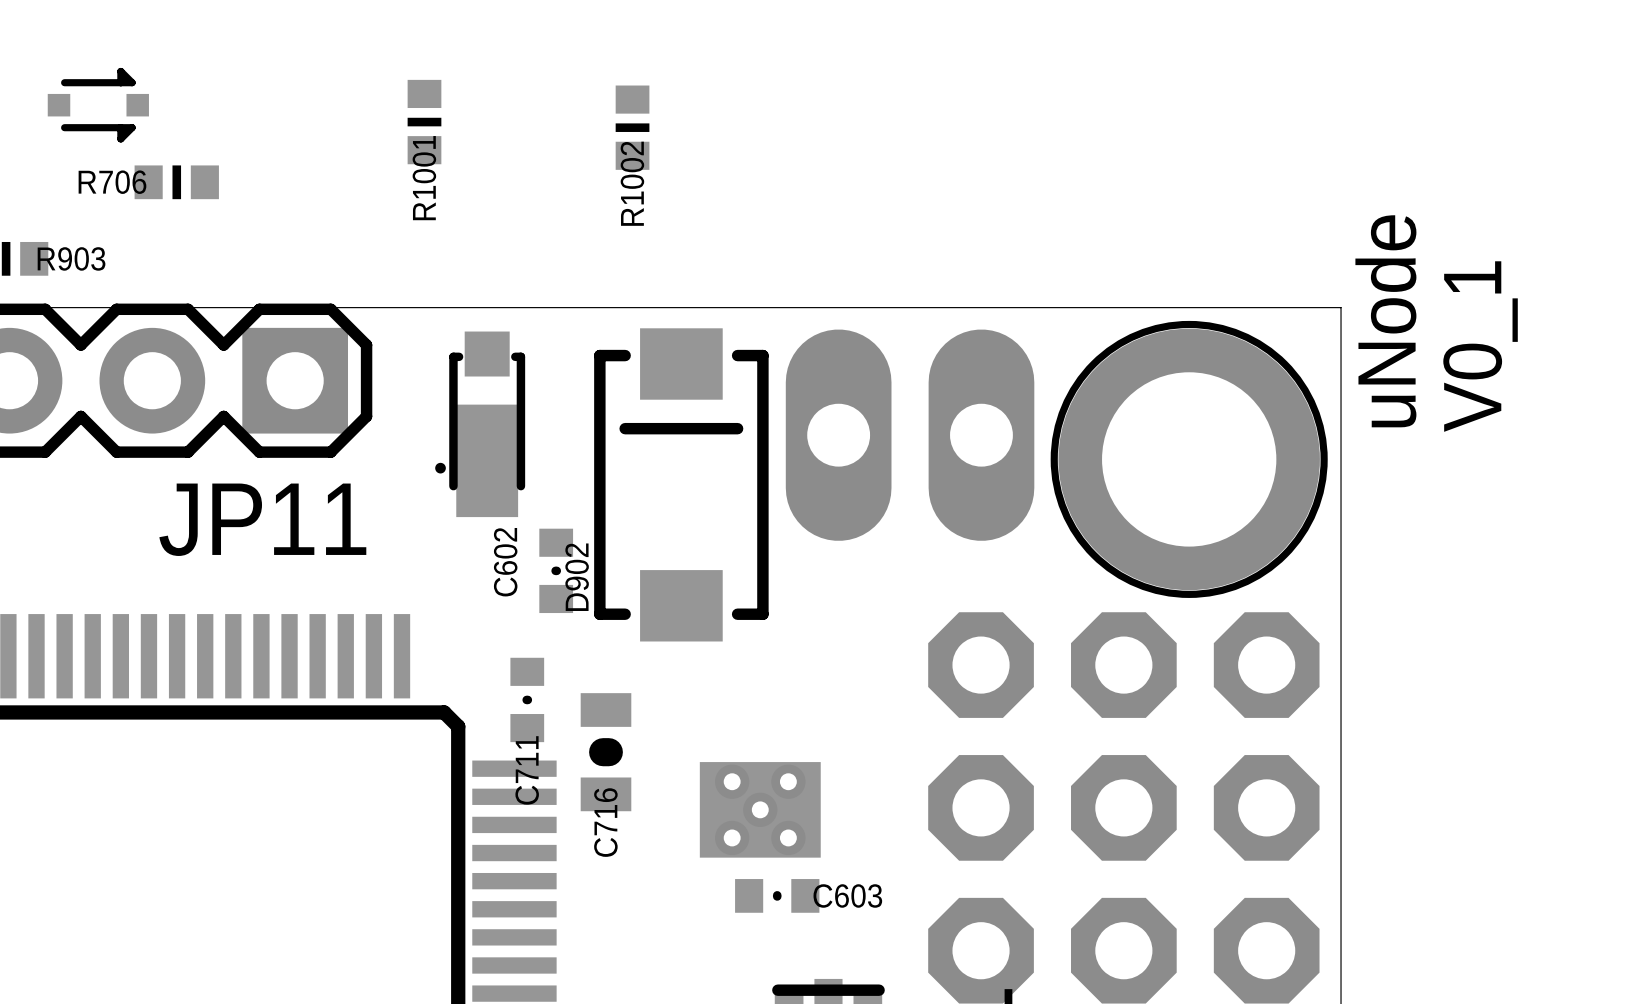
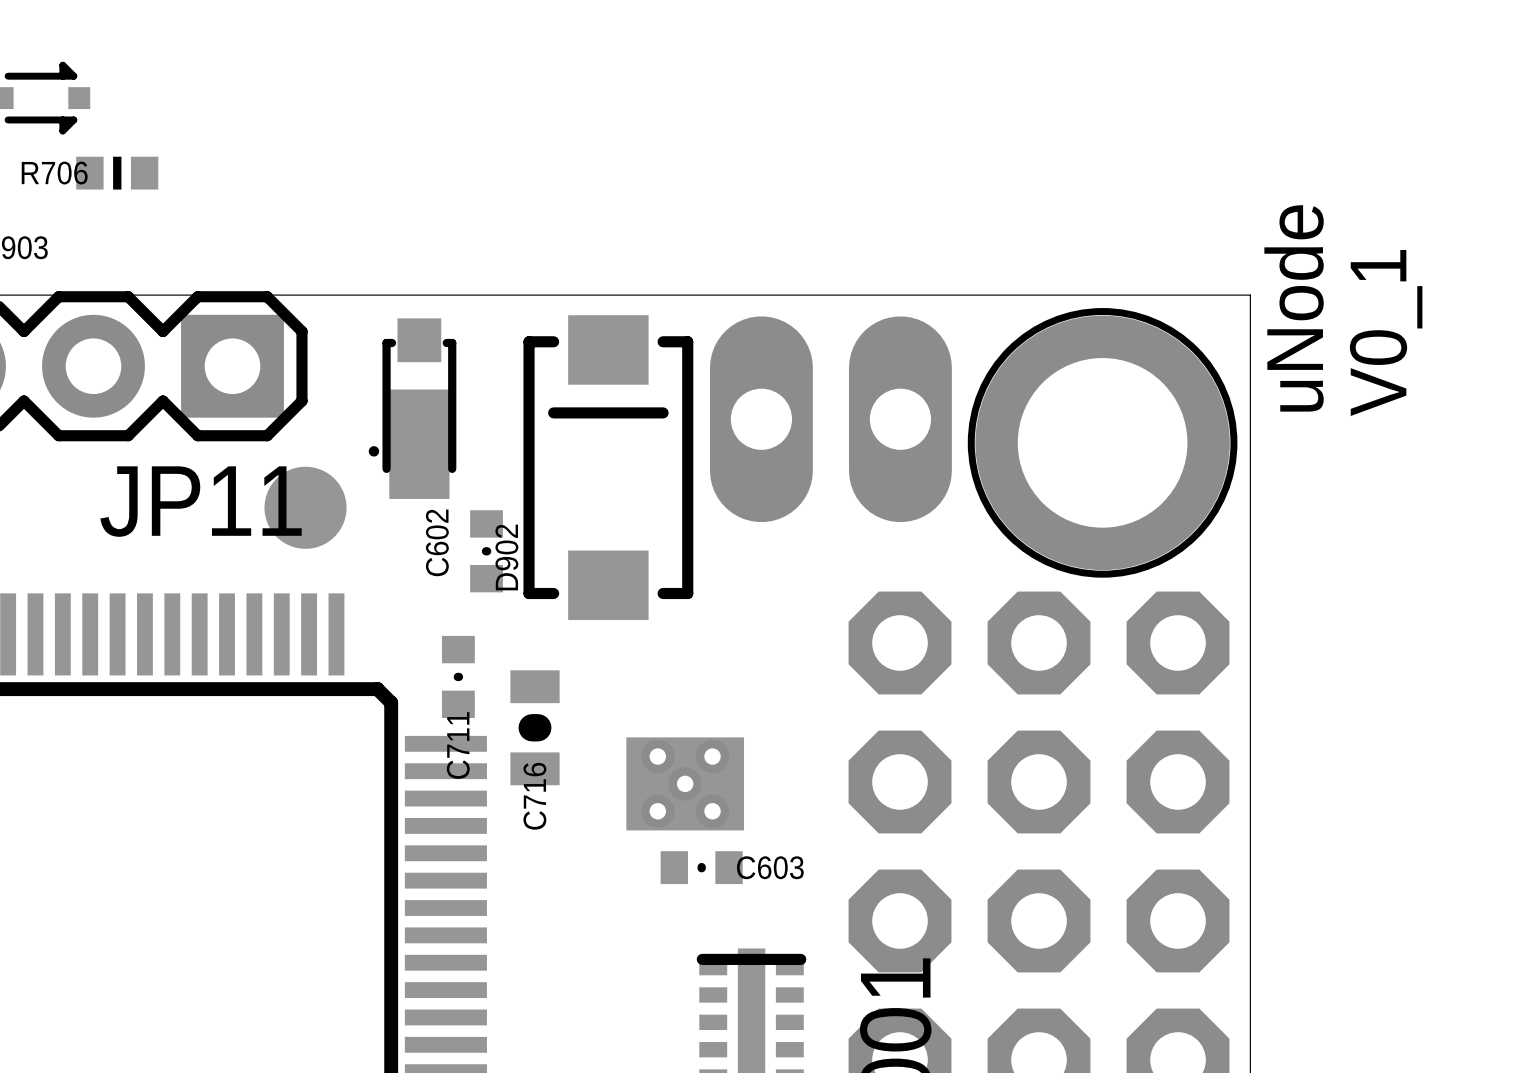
R1001: (424, 122) -> none
R1002: (632, 127) -> none
part: none -> (305, 507)

